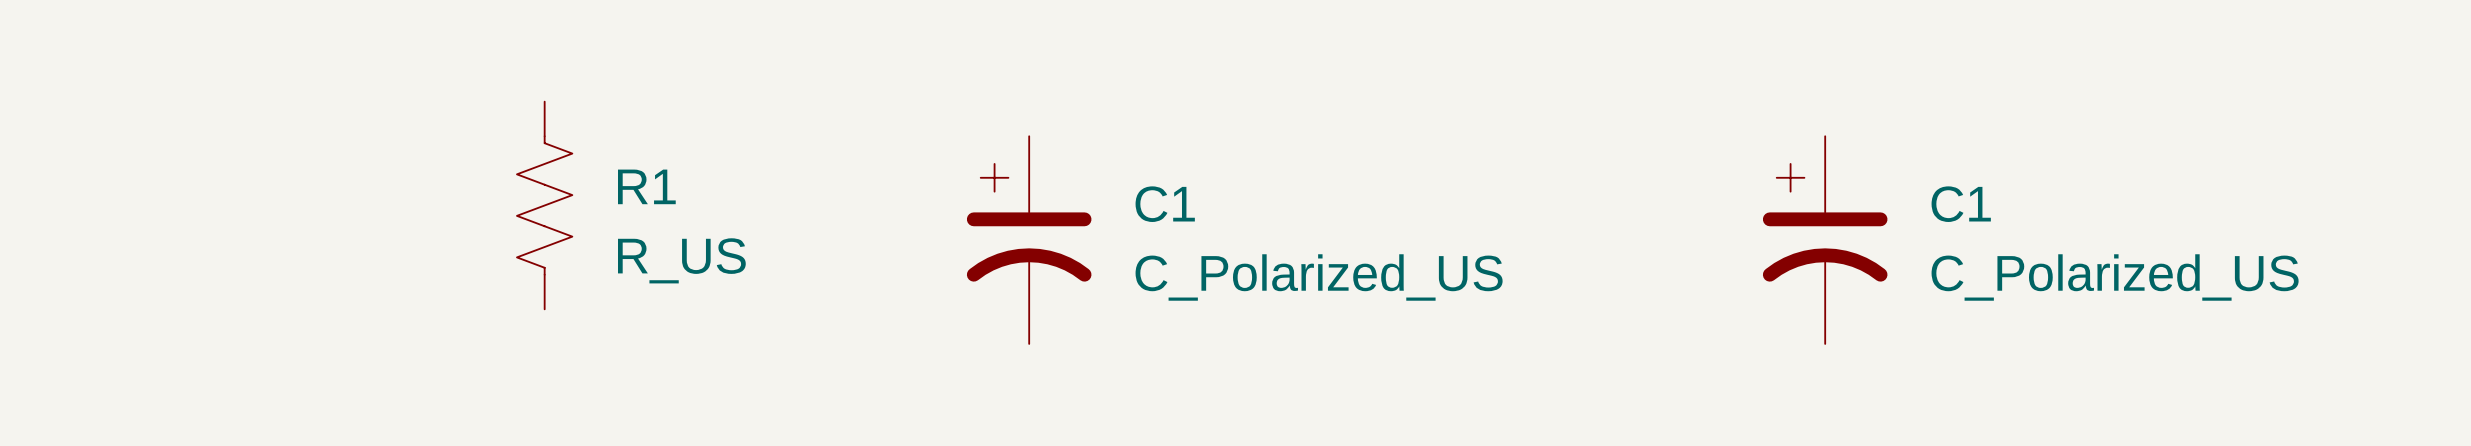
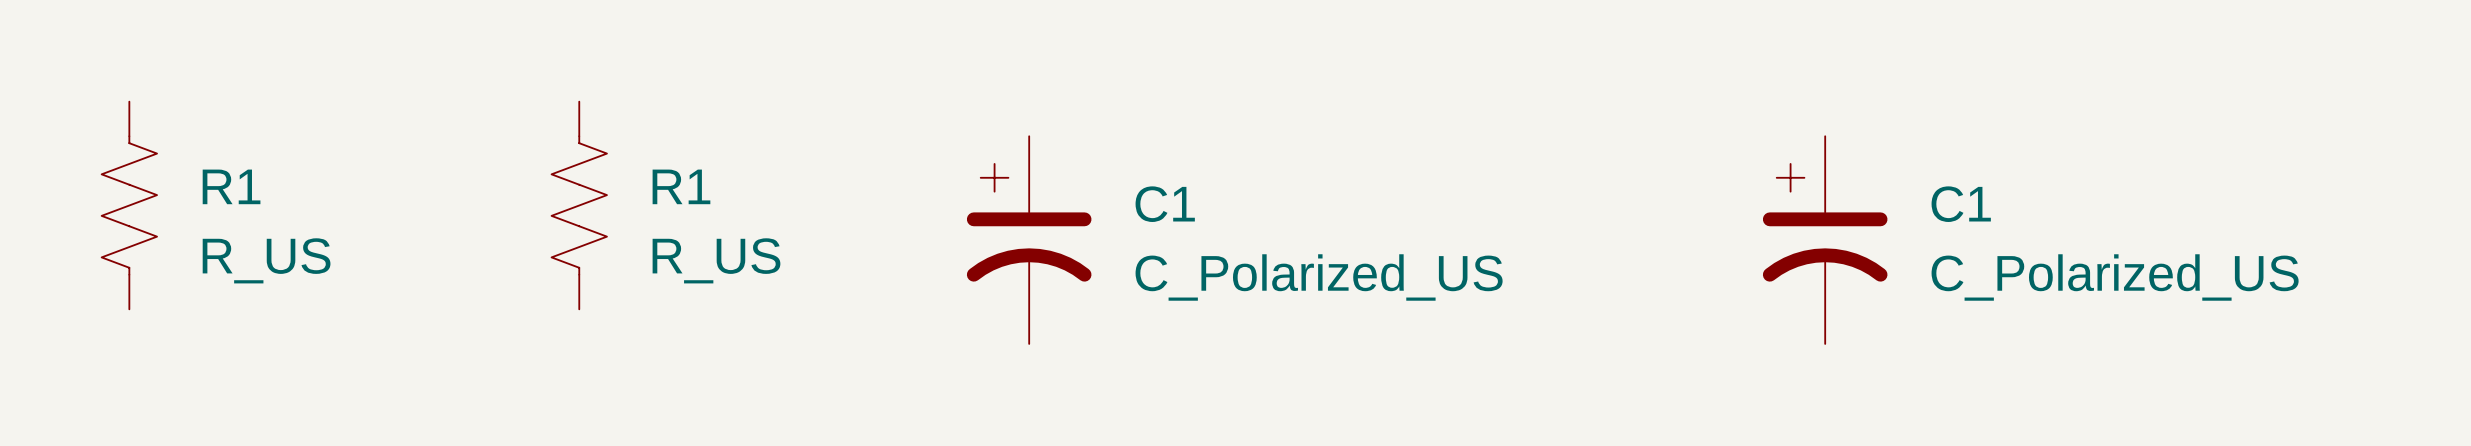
R1: none -> R_US (129, 205)
R1 position: (544, 205) -> (579, 205)

